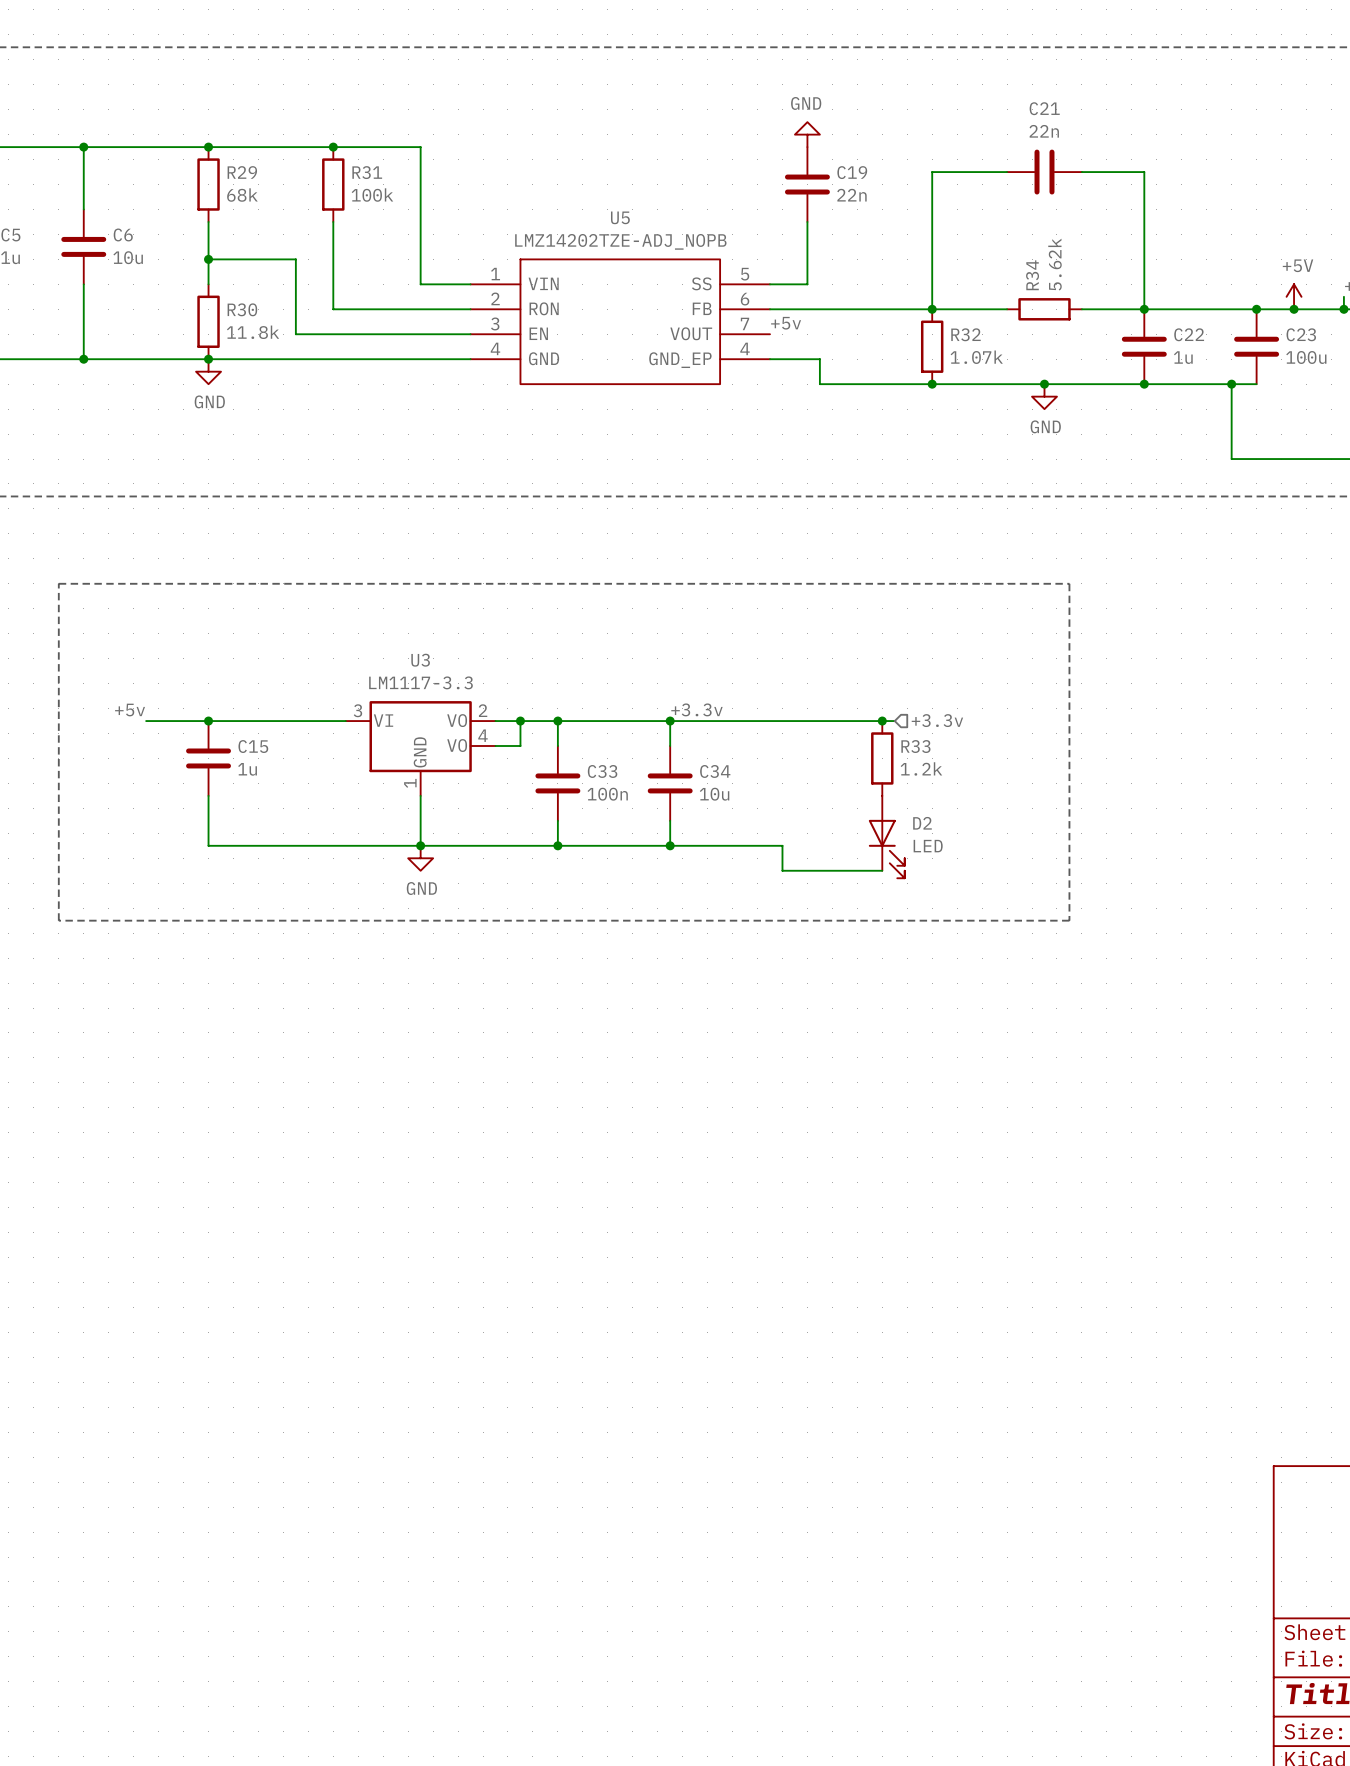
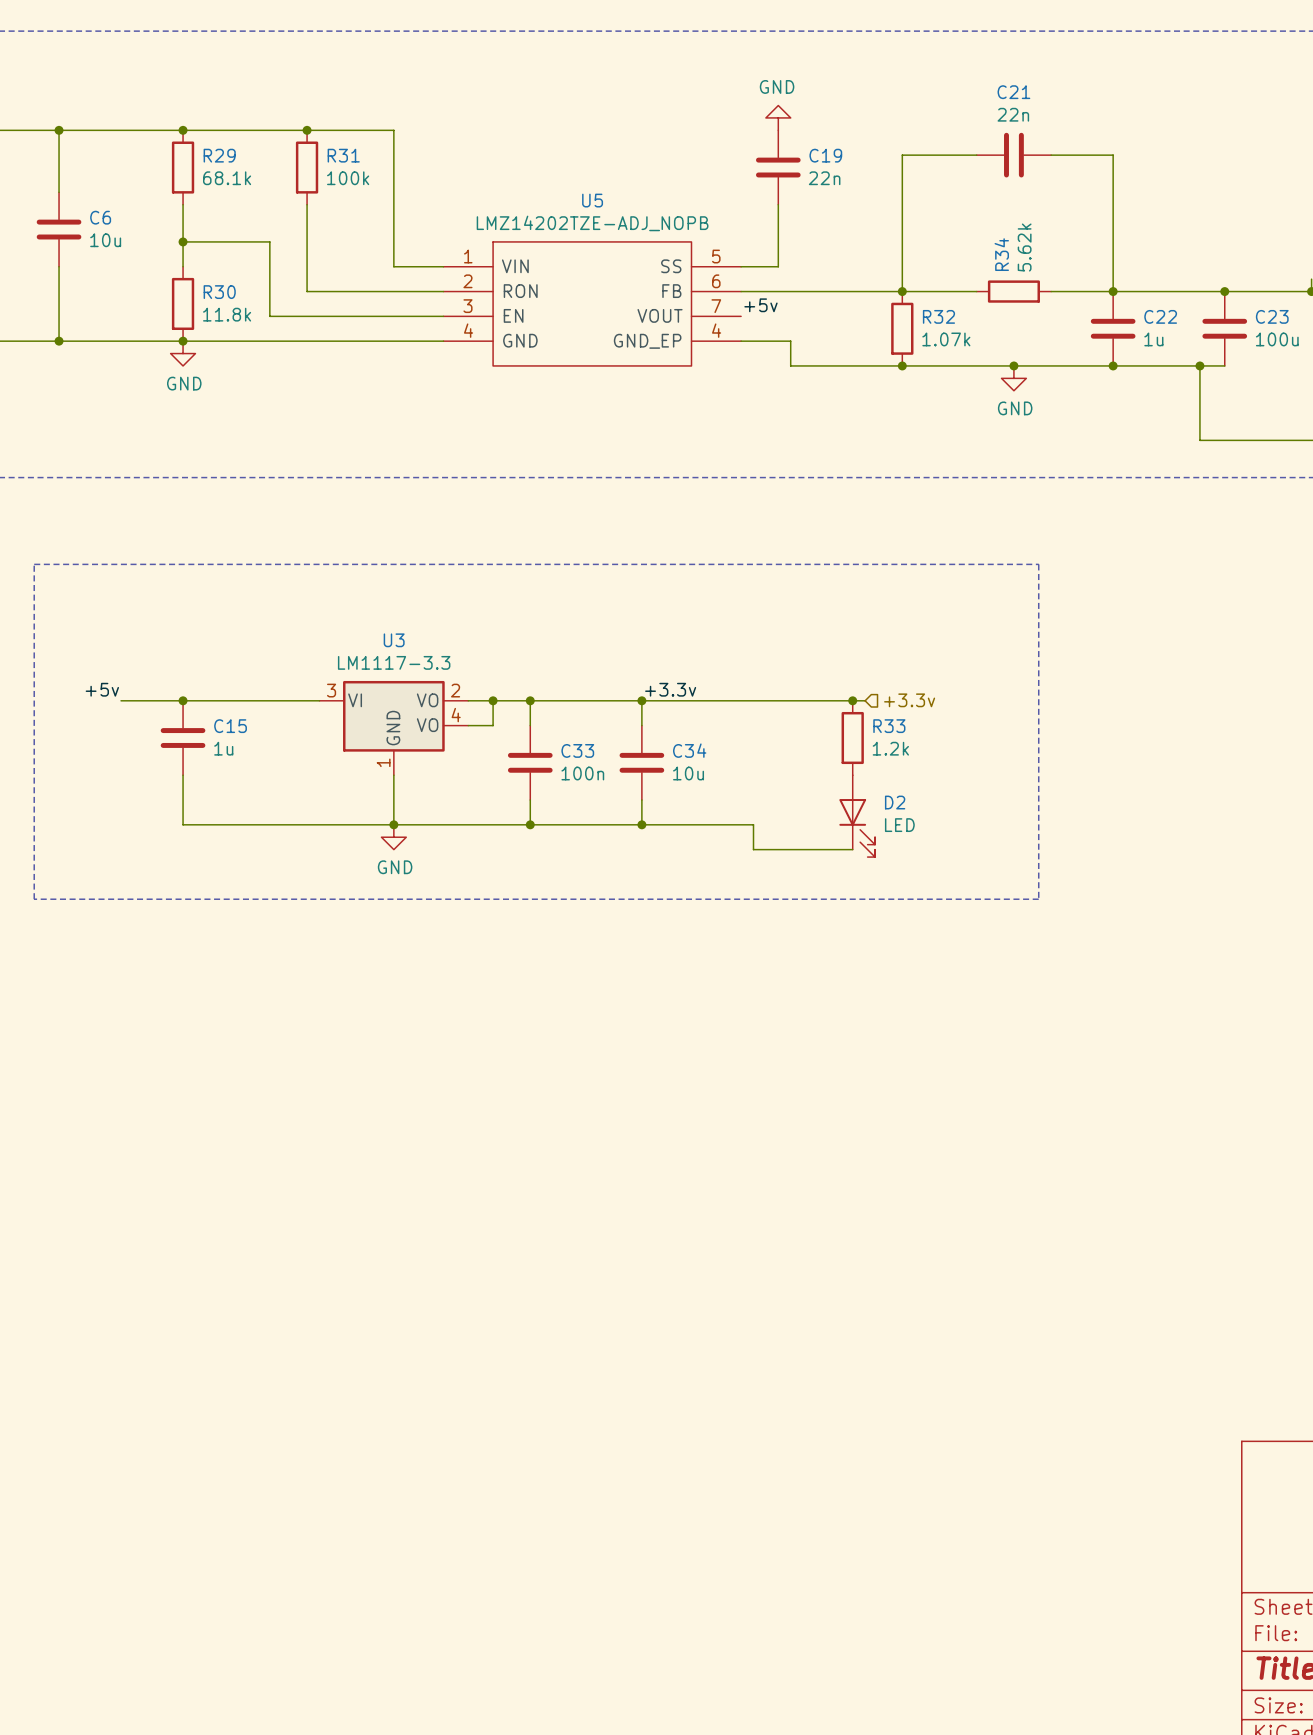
R29 value: 68k (242, 195) -> 68.1k (227, 178)
power symbol: +5V (1294, 296) -> none
junction: (1294, 309) -> none

